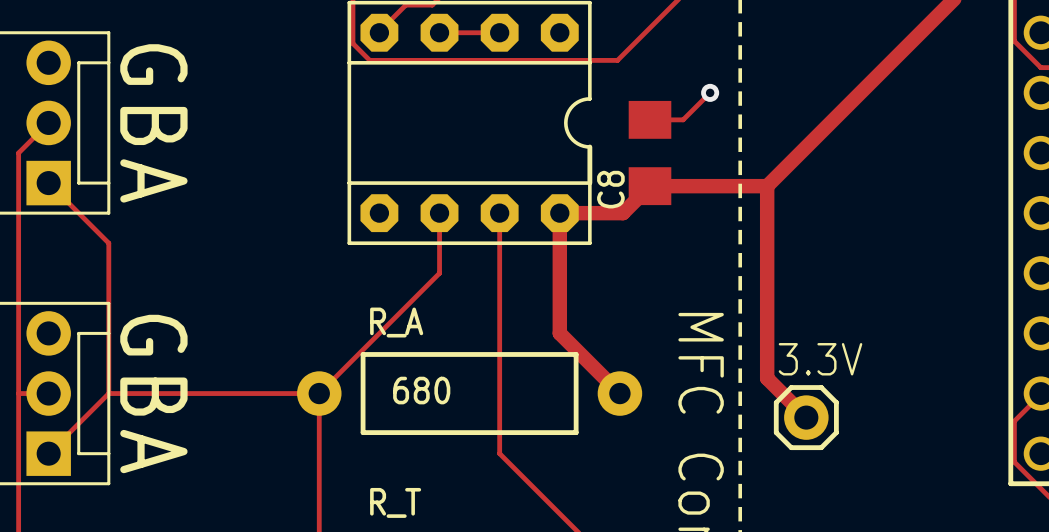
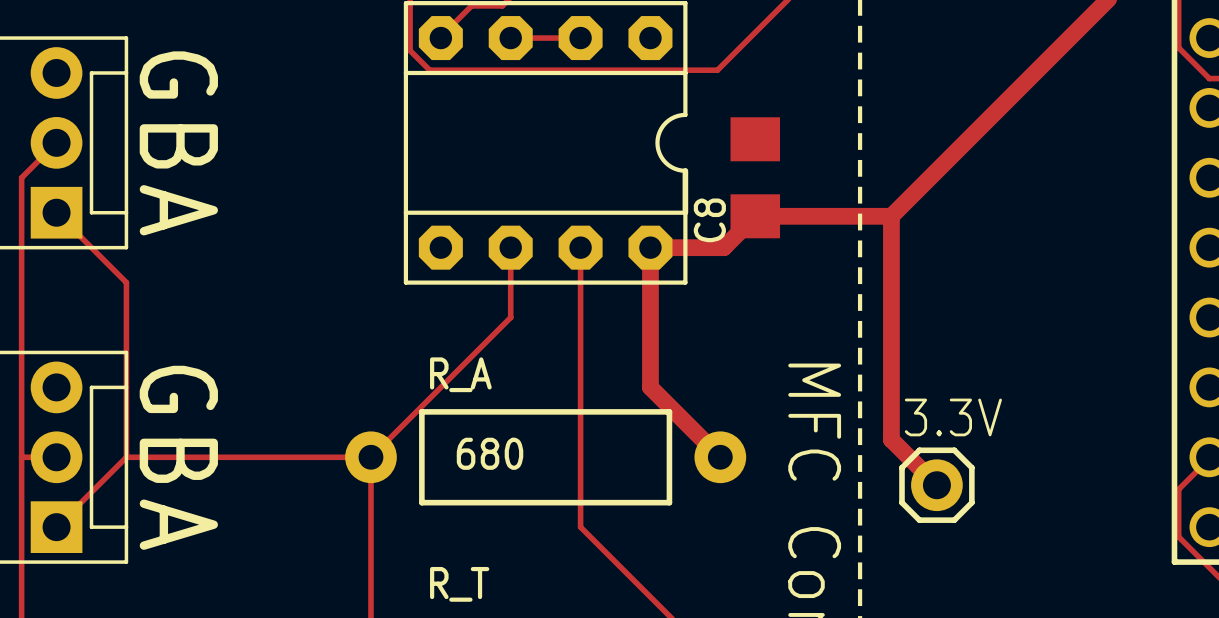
track: (710, 92) (683, 119) (650, 119) -> none
via: (710, 92) -> none

